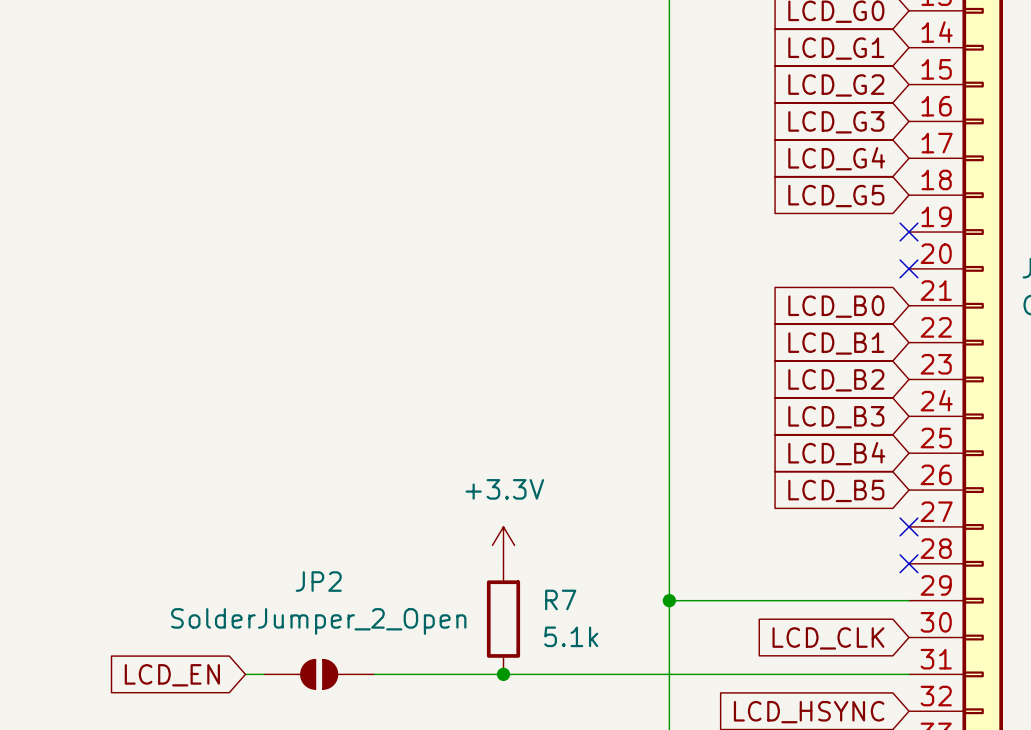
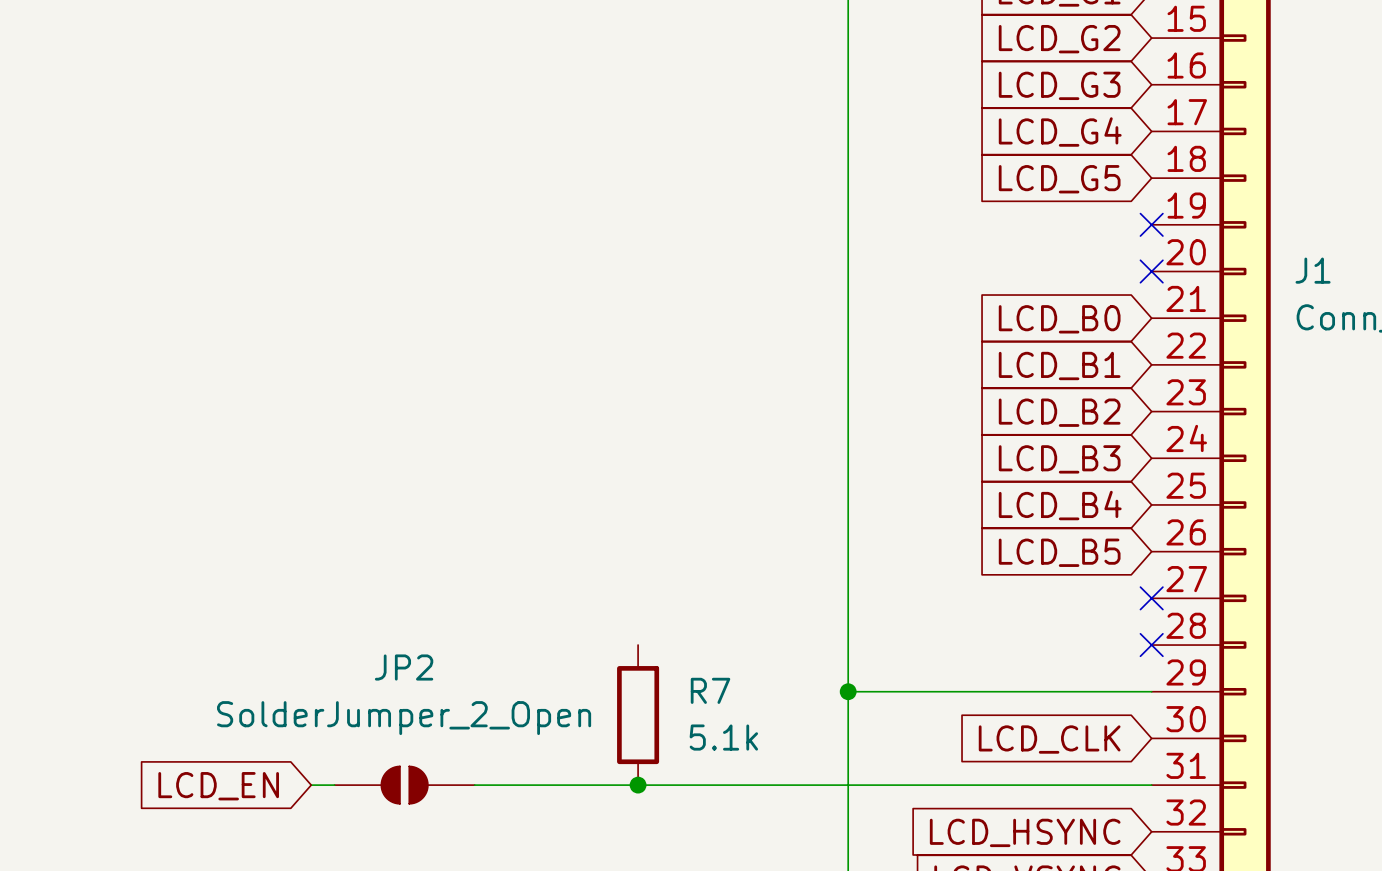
power symbol: +3.3V (503, 545) -> none

